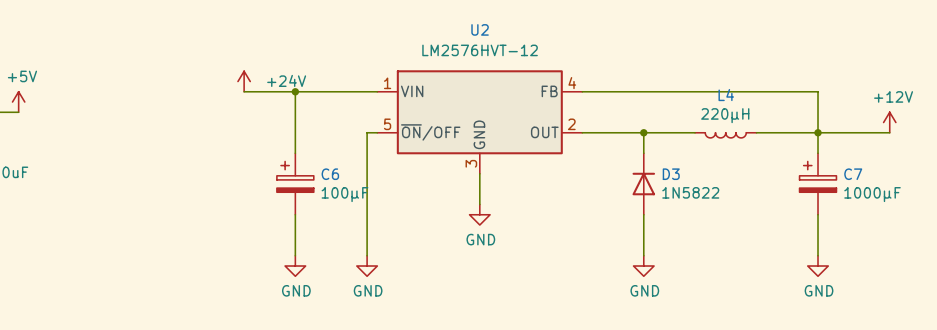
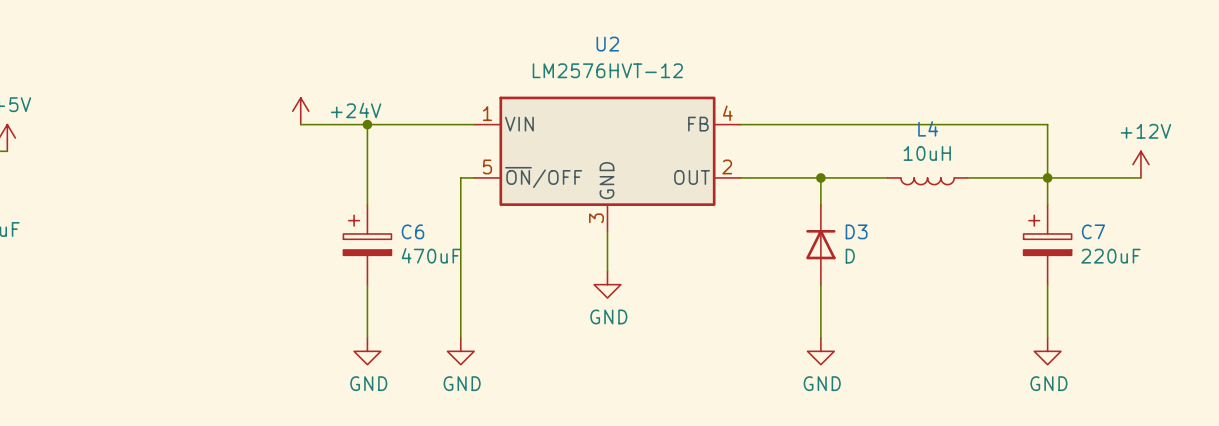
L4 value: 220µH (725, 115) -> 10uH (927, 153)
D3 value: 1N5822 (690, 192) -> D (850, 256)
C6 value: 100µF (344, 194) -> 470uF (431, 255)
C7 value: 1000µF (872, 194) -> 220uF (1110, 256)

